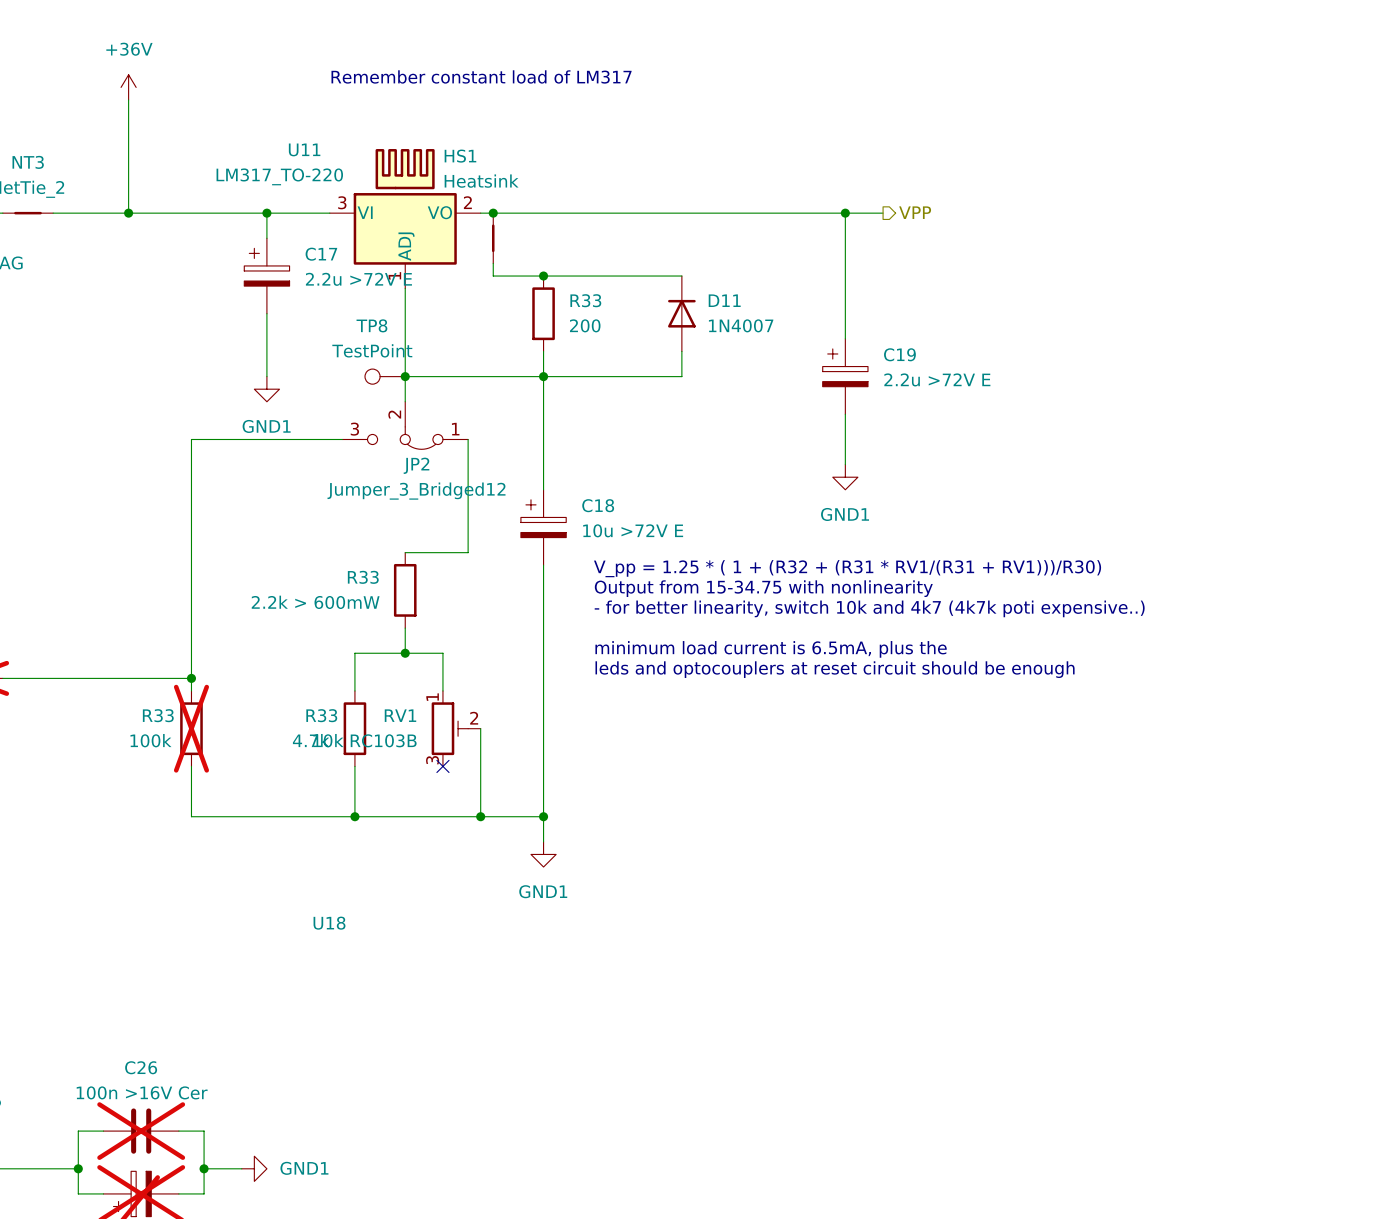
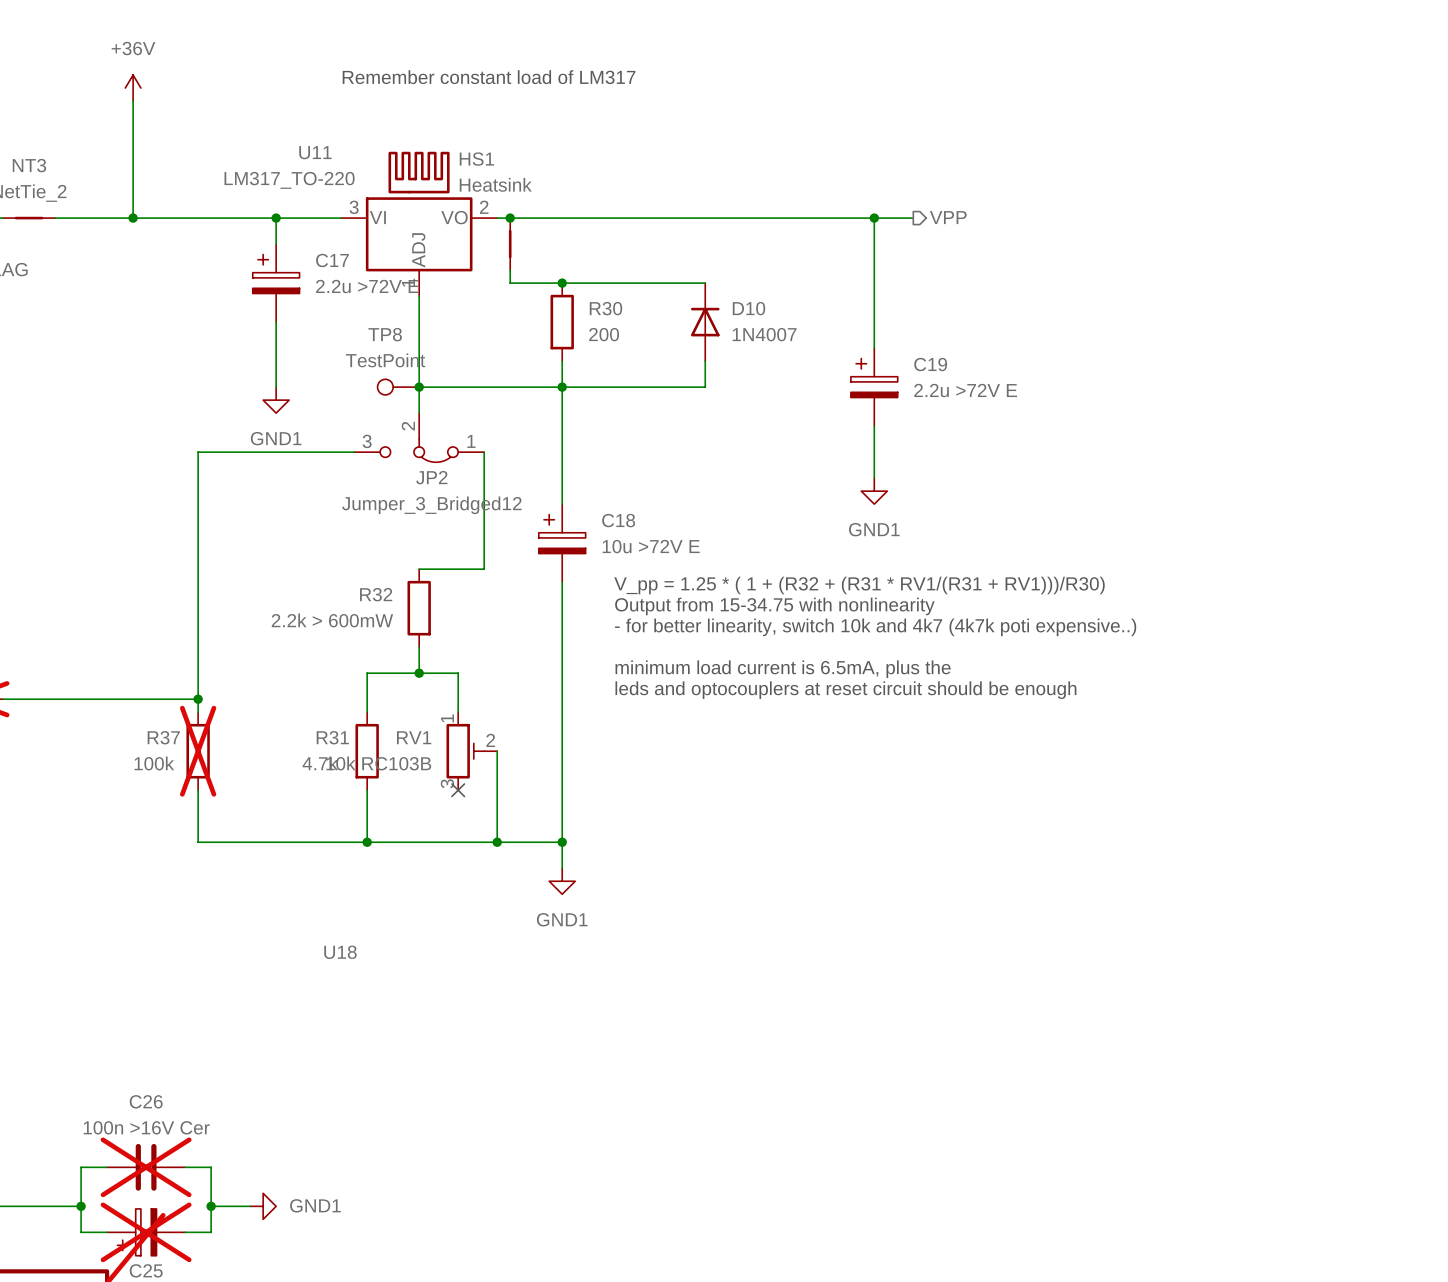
R33 name: R33 (585, 300) -> R30 (605, 308)
D11 name: D11 (724, 300) -> D10 (749, 308)
R33 name: R33 (363, 577) -> R32 (376, 594)
R33 name: R33 (158, 715) -> R37 (163, 737)
R33 name: R33 (321, 715) -> R31 (332, 737)

